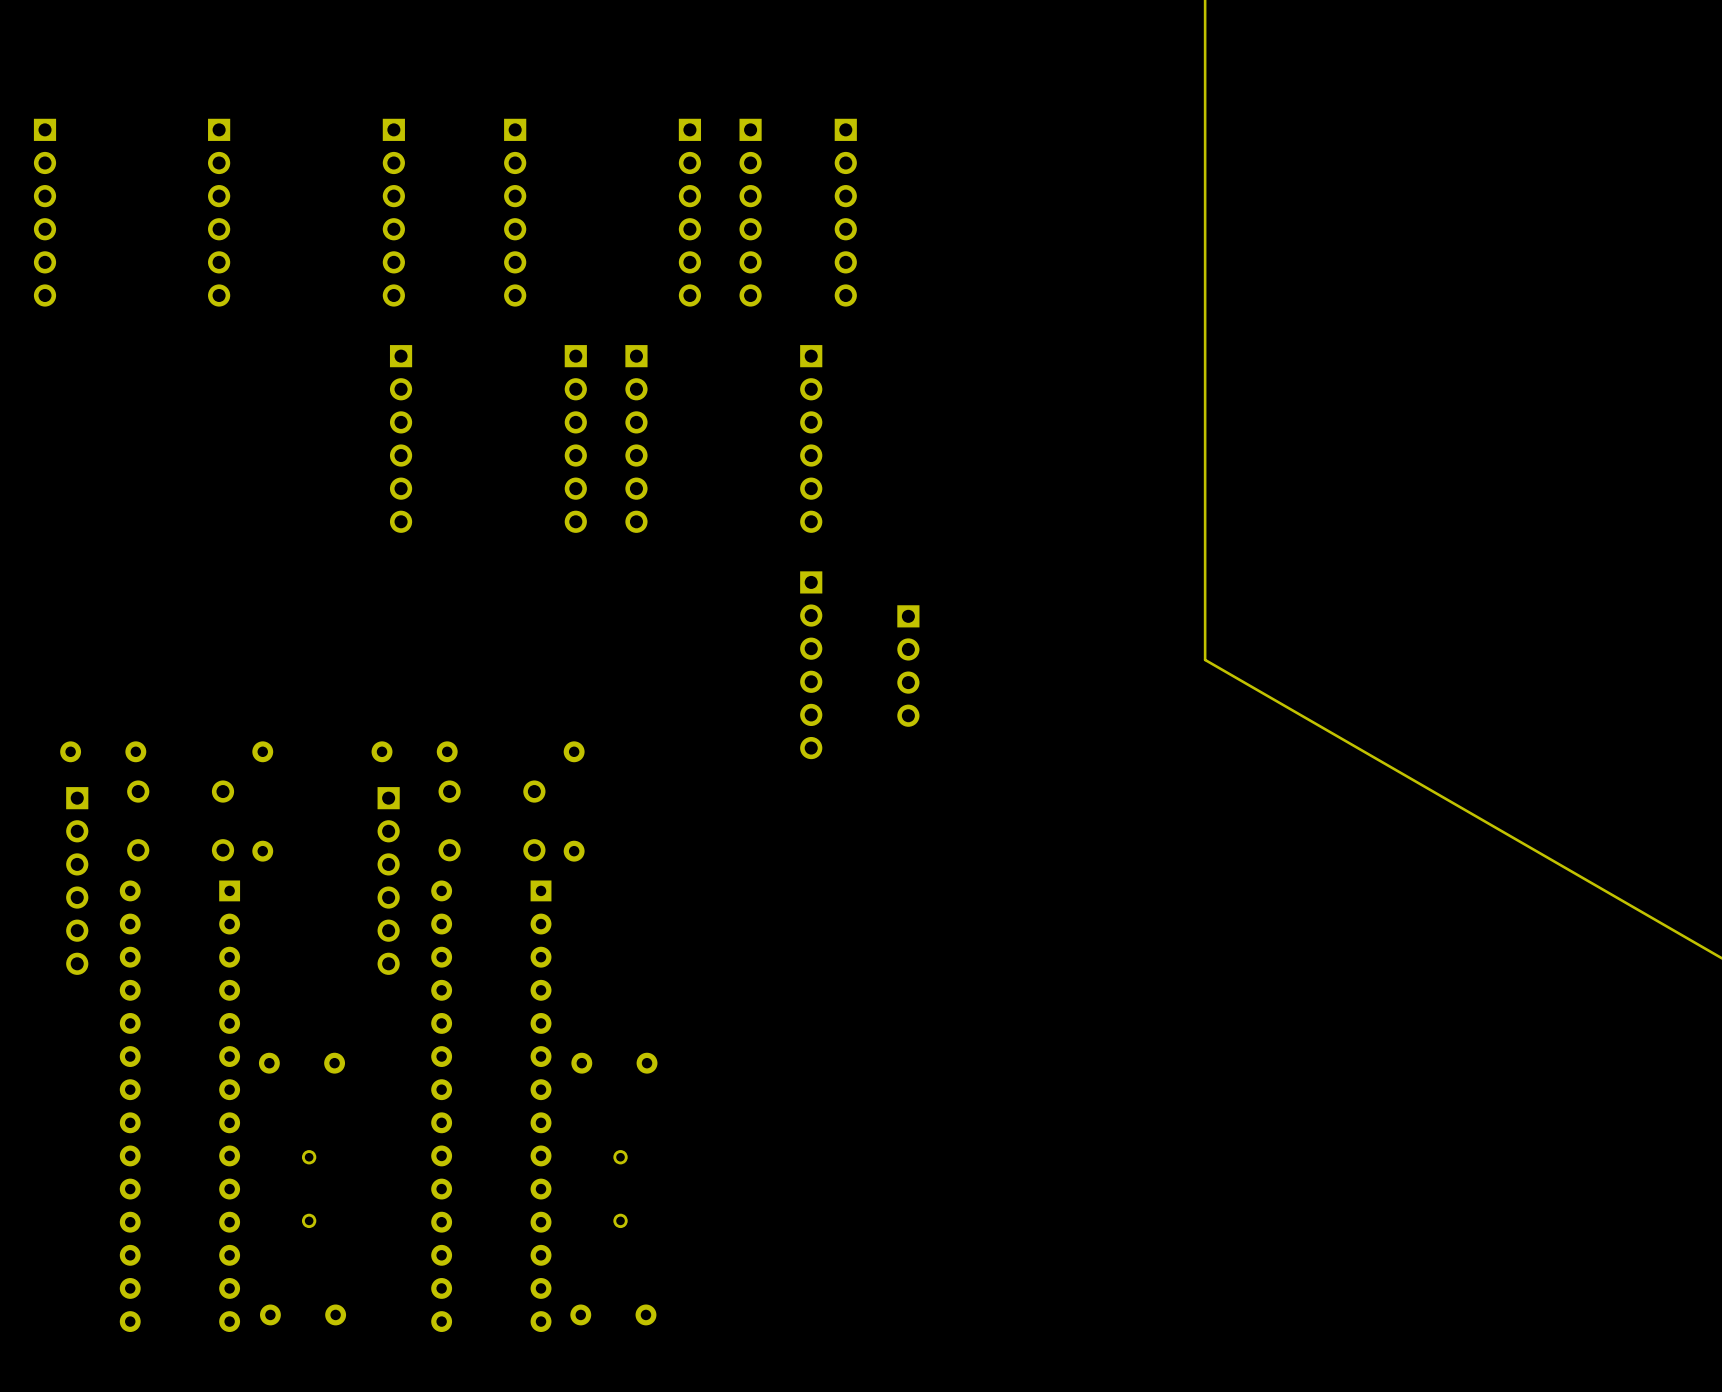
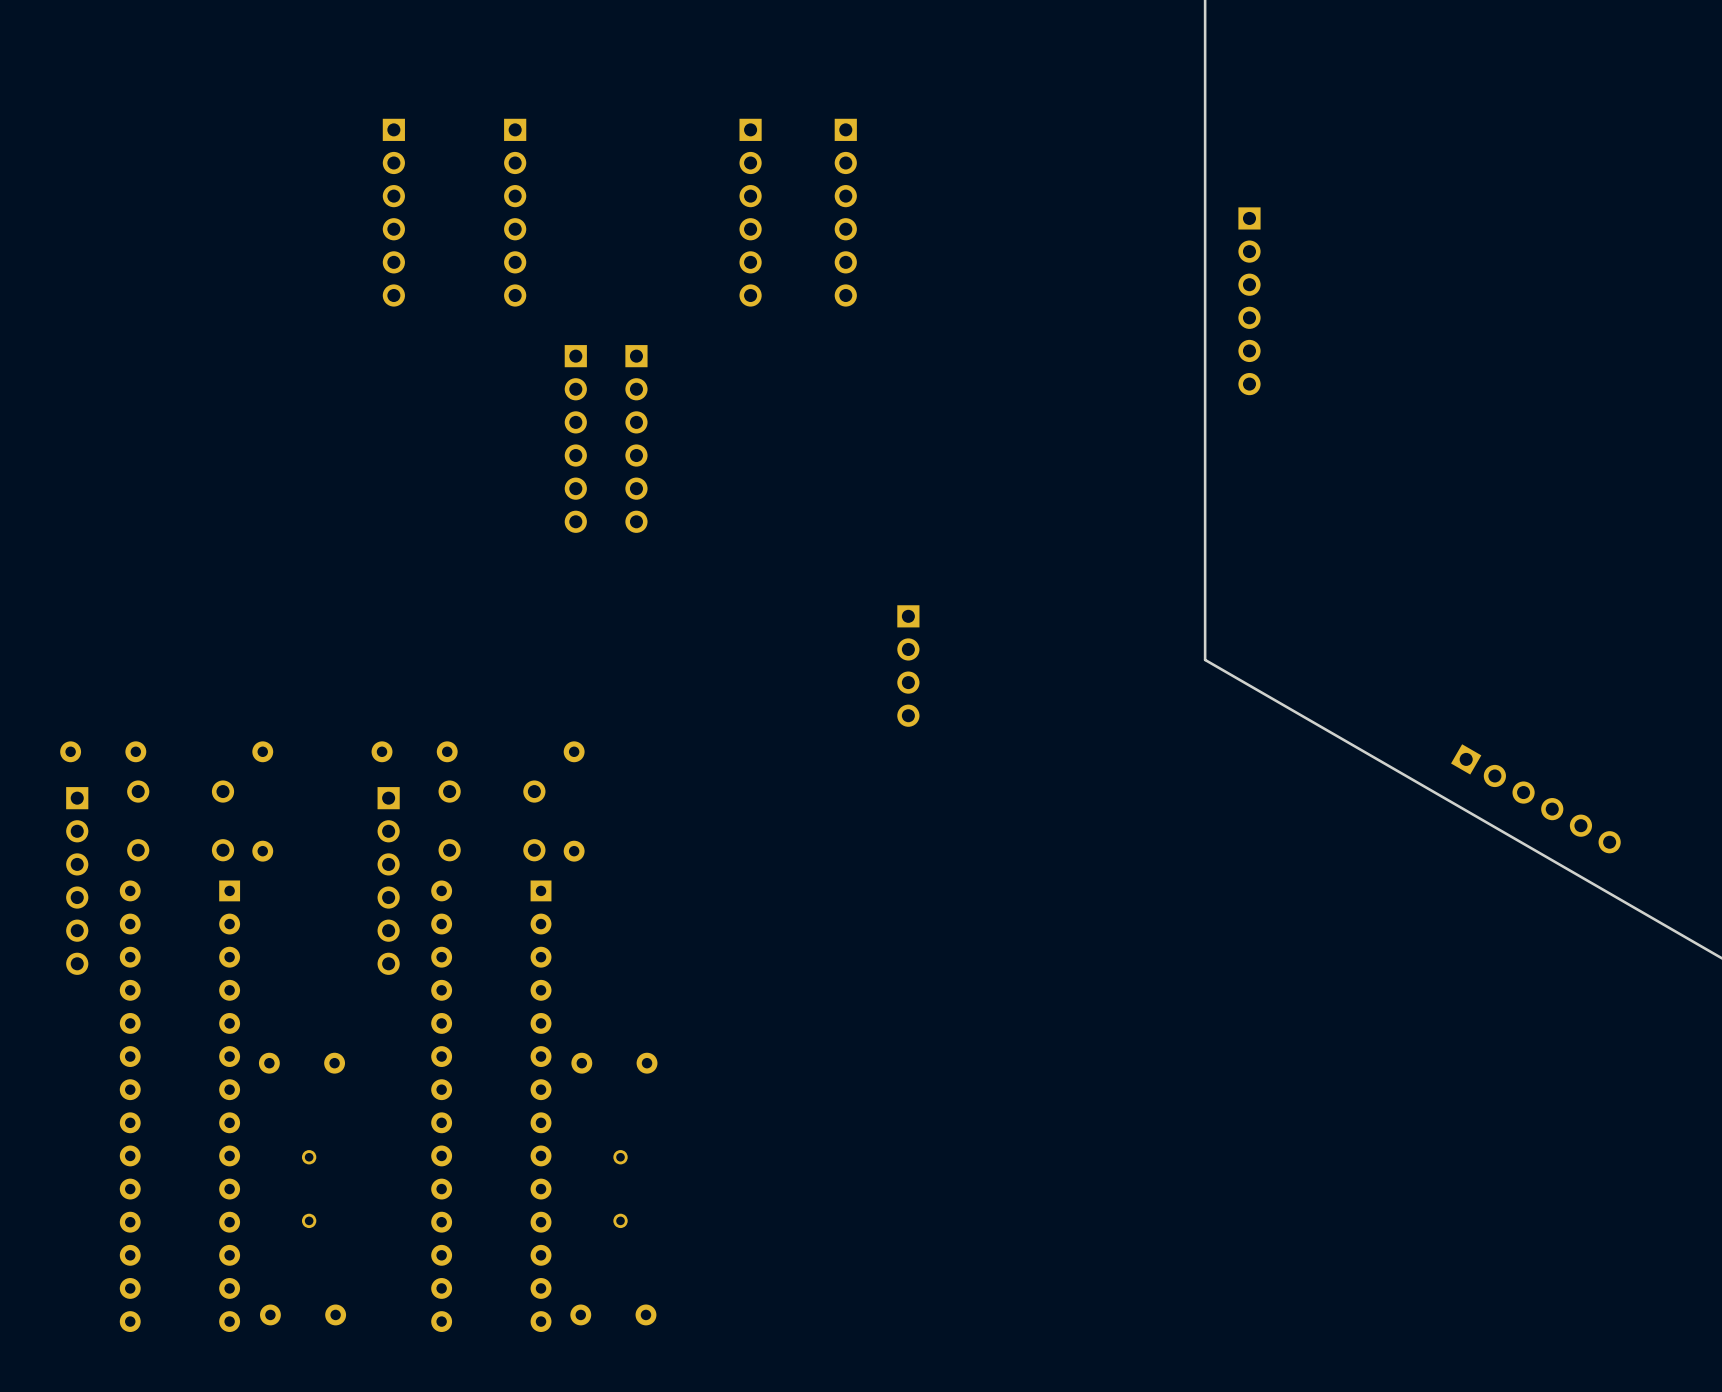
part: (45, 212) -> none
part: (219, 212) -> none
part: (689, 212) -> none
part: none -> (1249, 301)
part: (401, 438) -> none
part: (811, 438) -> none
part: (811, 665) -> none
part: none -> (1535, 798)

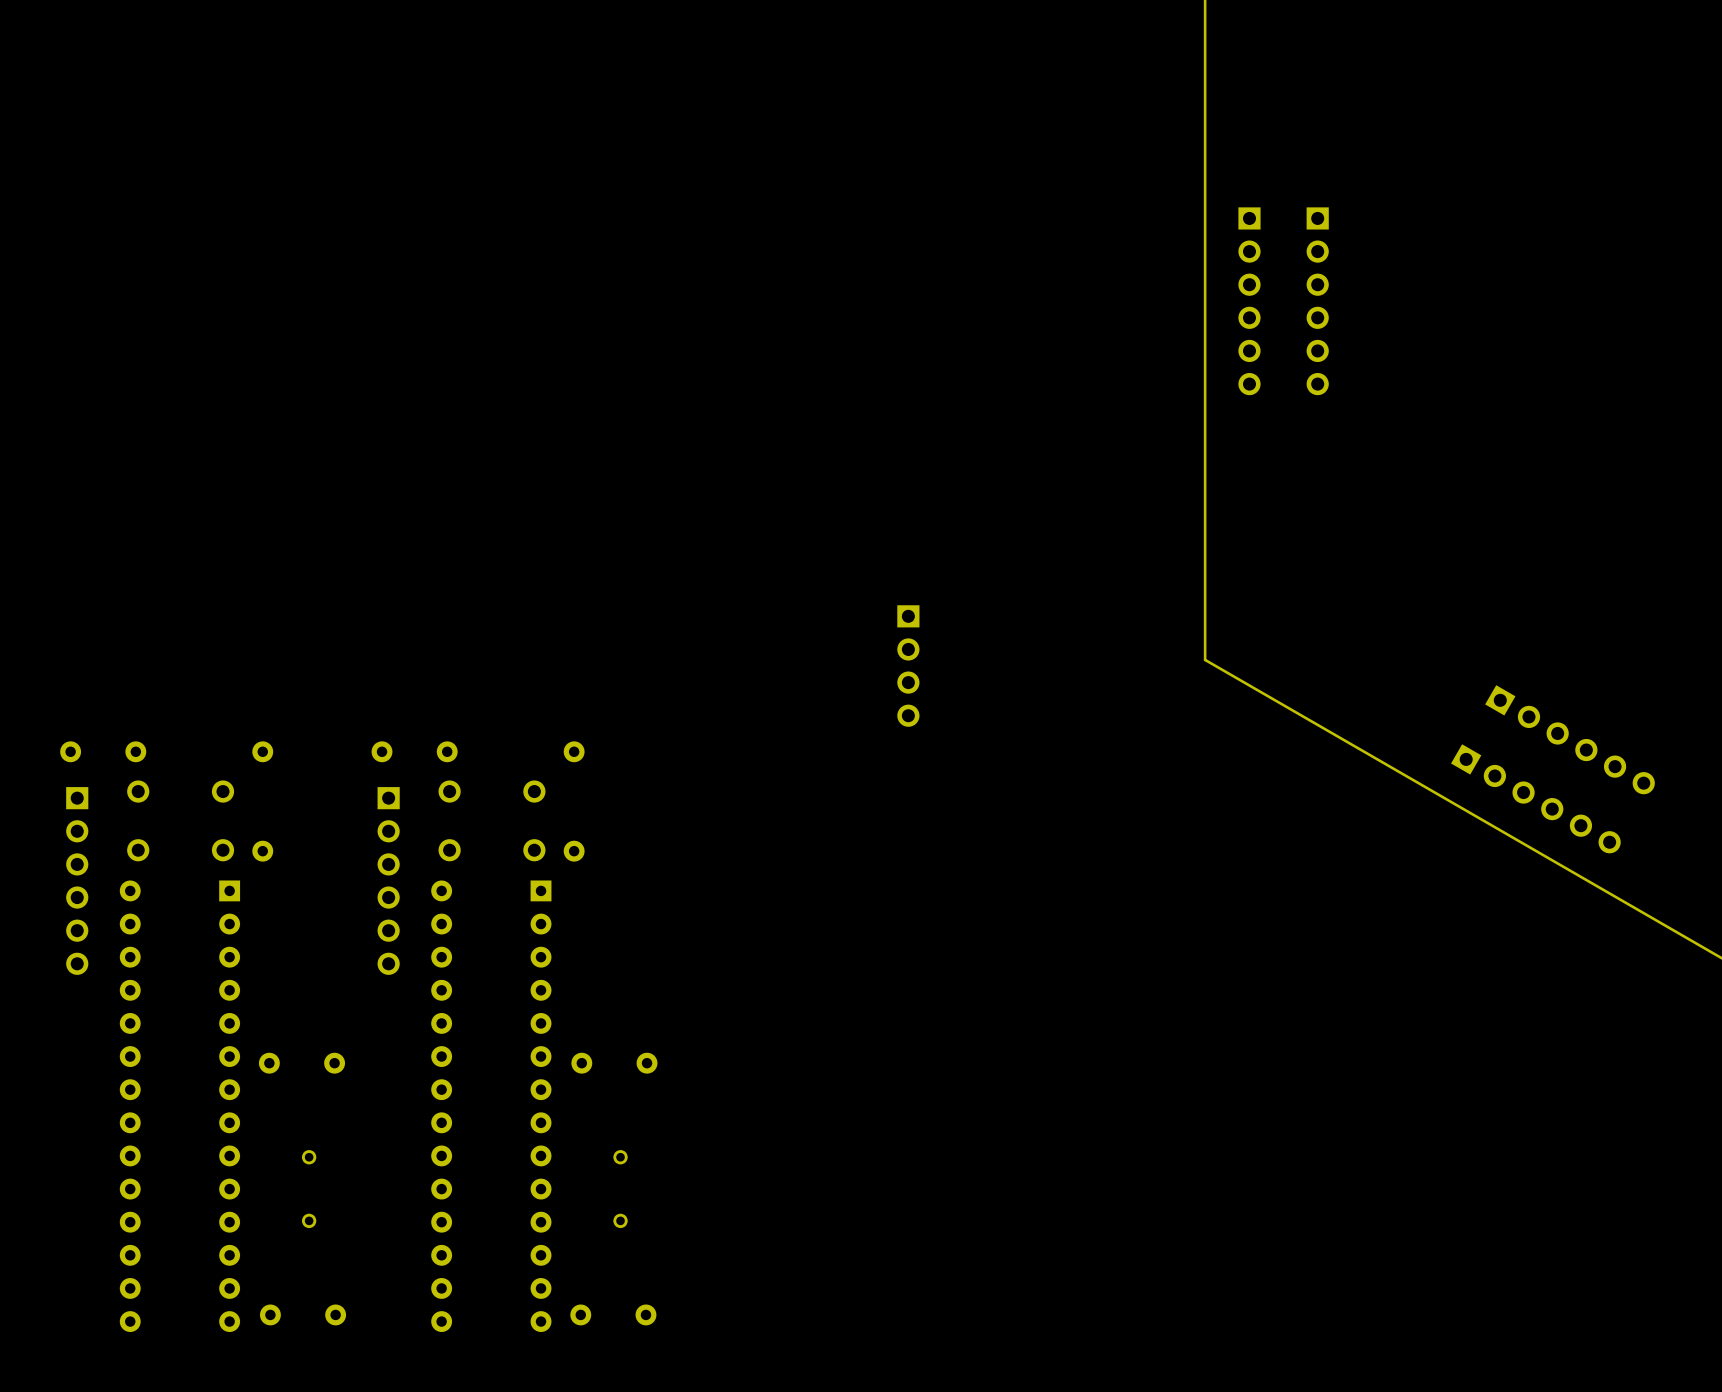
part: (393, 212) -> none
part: (515, 212) -> none
part: (750, 212) -> none
part: (845, 212) -> none
part: none -> (1317, 301)
part: (575, 438) -> none
part: (636, 438) -> none
part: none -> (1569, 739)

